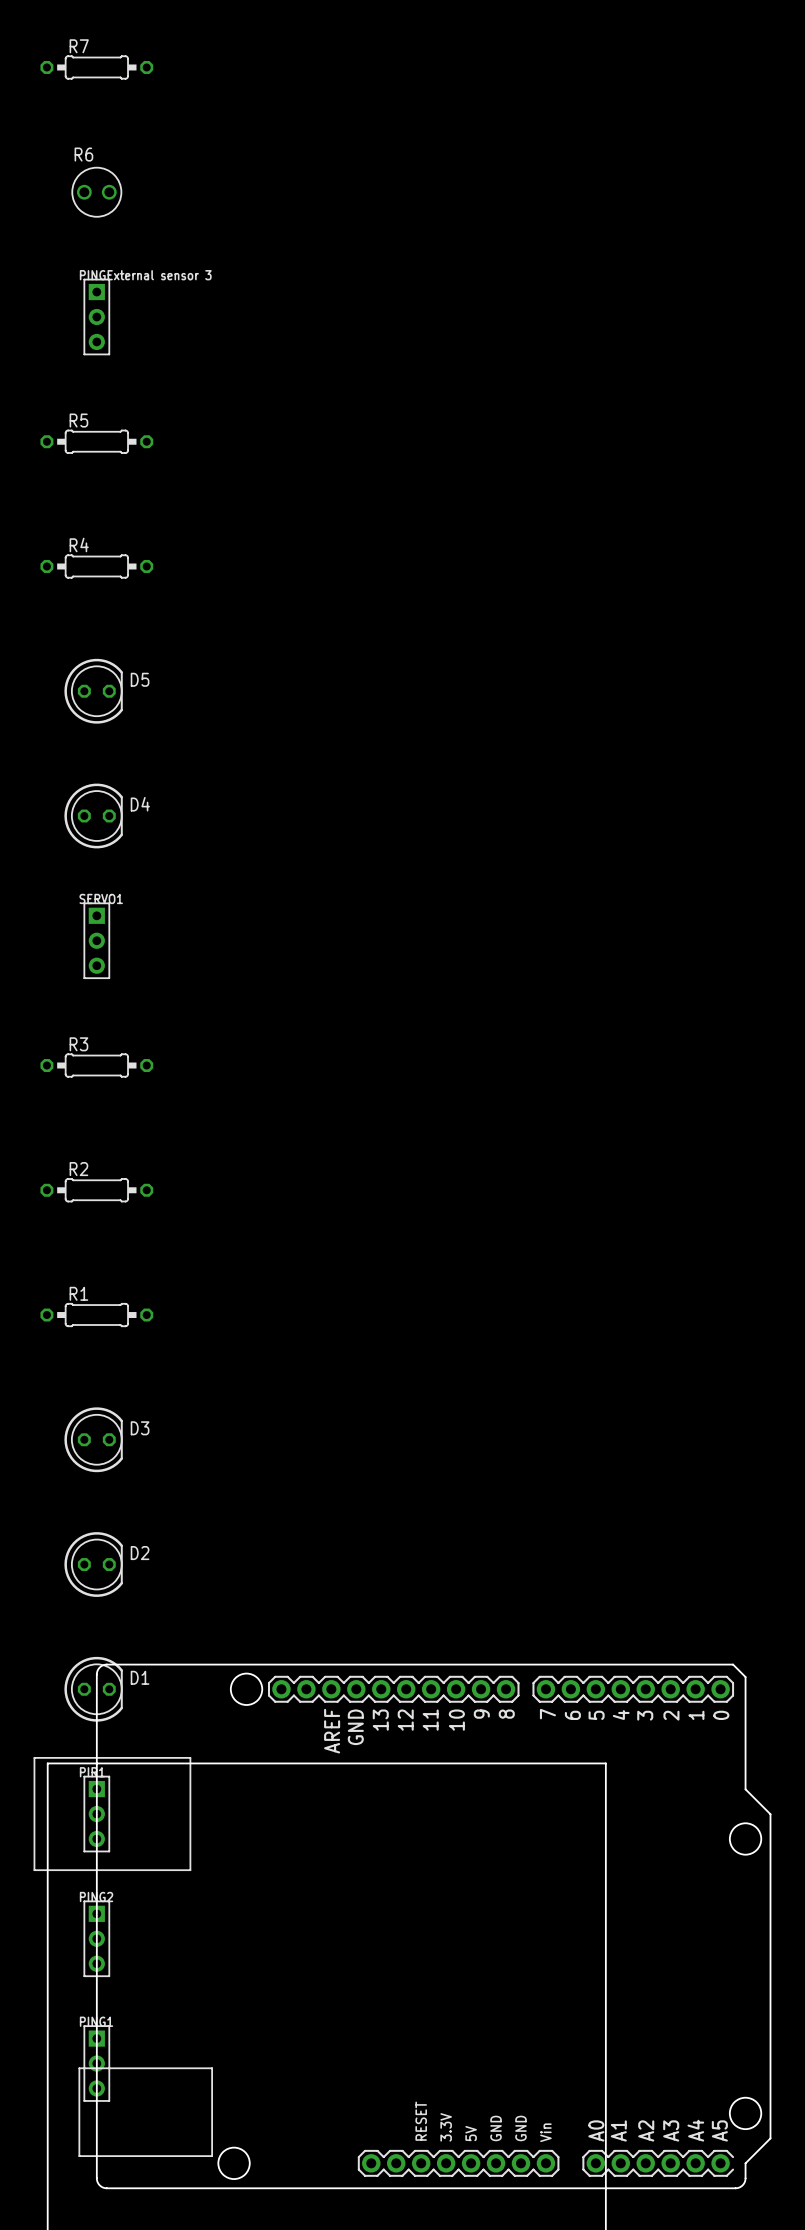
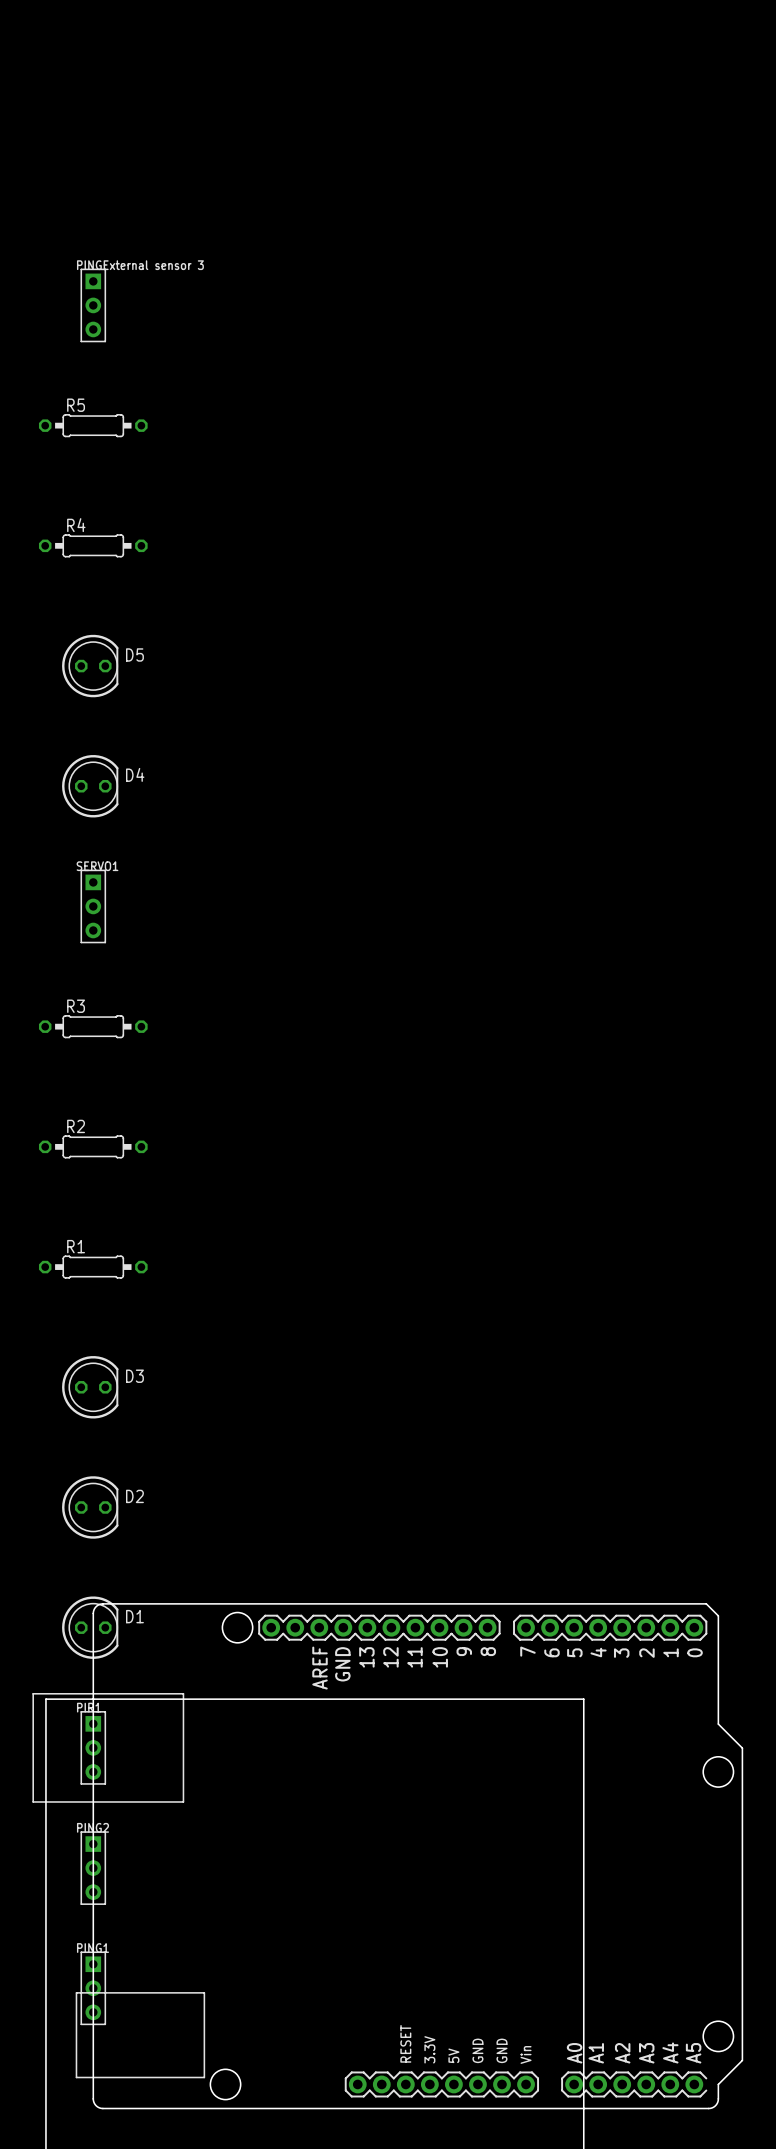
R7: (96, 67) -> none
R6: (96, 192) -> none

